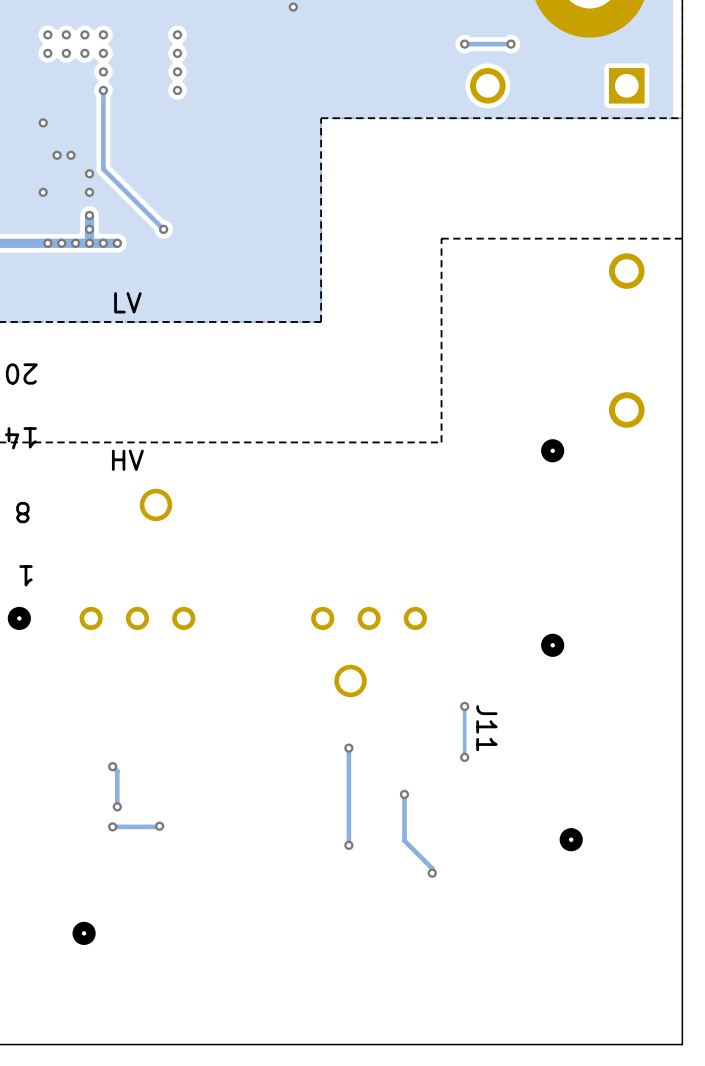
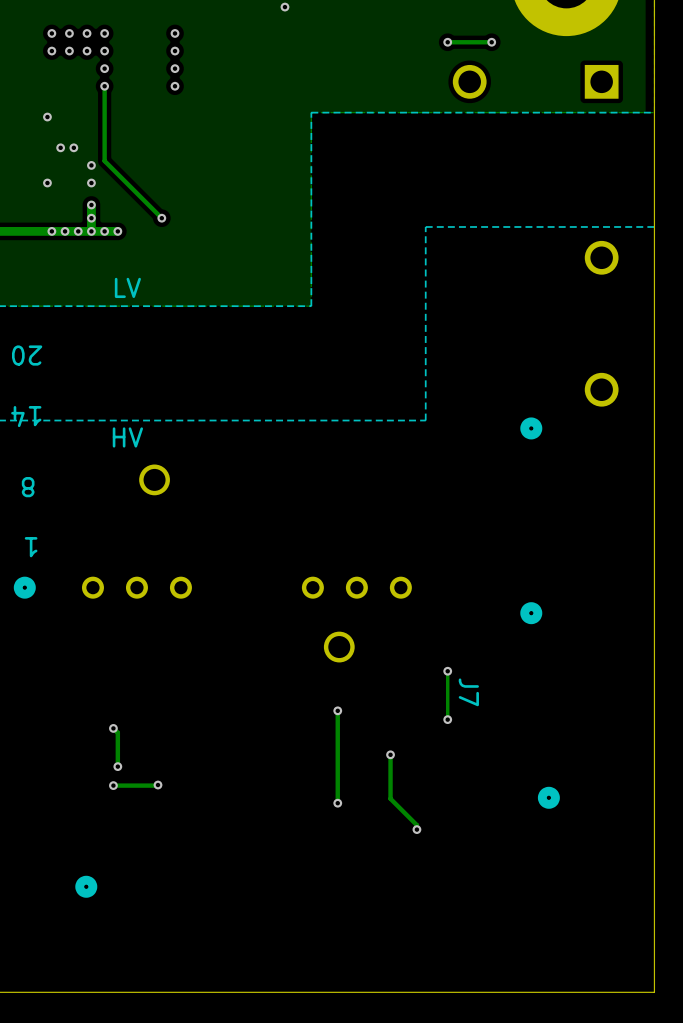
J11 name: J11 (486, 728) -> J7 (468, 692)

